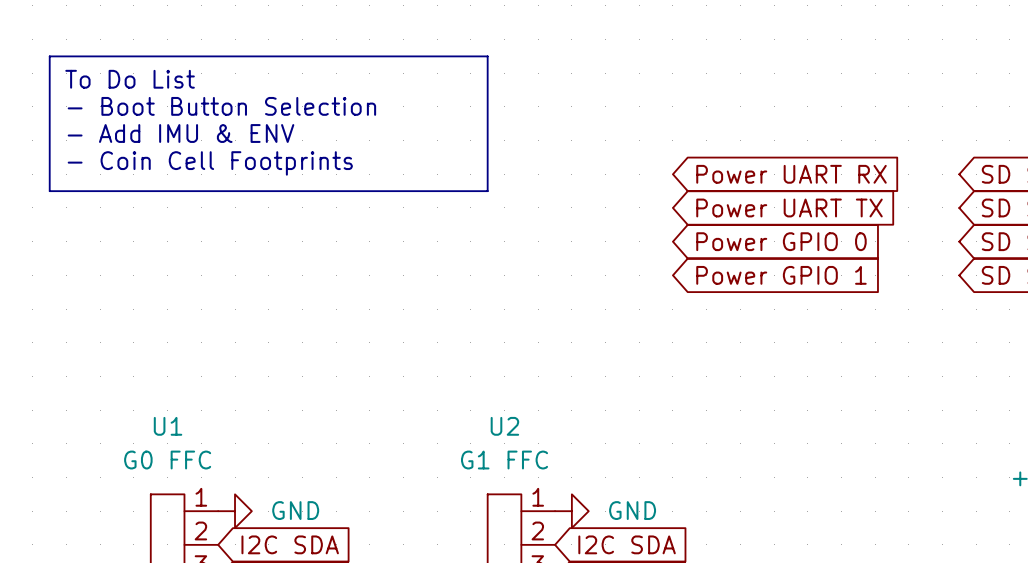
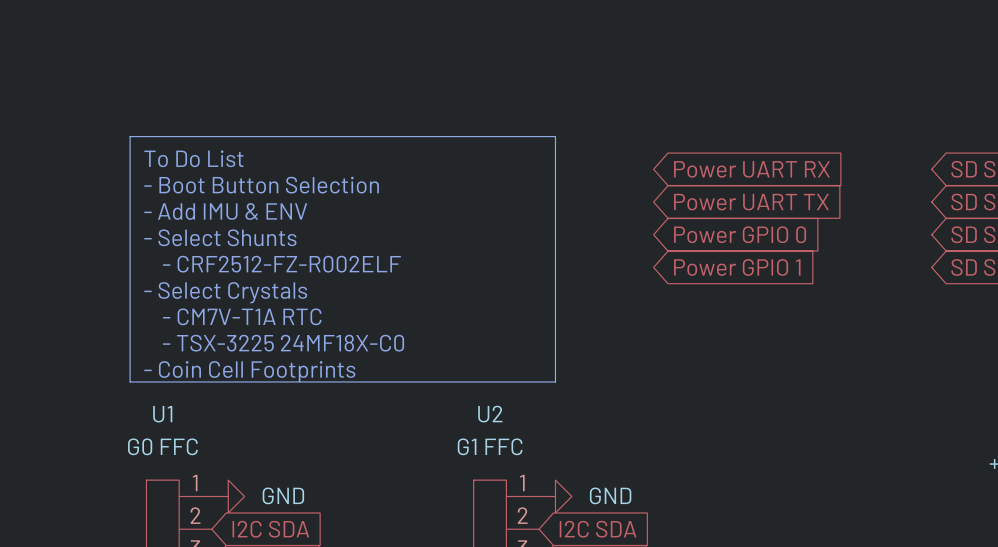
line: (49, 56) (487, 56) (487, 191) (49, 191) (49, 56) -> none
text position: To Do List (130, 79) -> To Do List (193, 158)
text position: - Boot Button Selection (221, 106) -> - Boot Button Selection (261, 185)
text position: - Add IMU & ENV (181, 133) -> - Add IMU & ENV (225, 211)
line: none -> (130, 136) (555, 136) (555, 381) (130, 381) (130, 136)
text position: - Coin Cell Footprints (210, 163) -> - Coin Cell Footprints (249, 371)
text: none -> - Select Shunts (220, 237)
text: none -> - CRF2512-FZ-R002ELF (281, 264)
text: none -> - Select Crystals (225, 292)
text: none -> - CM7V-T1A RTC (242, 316)
text: none -> - TSX-3225 24MF18X-C0 (283, 343)

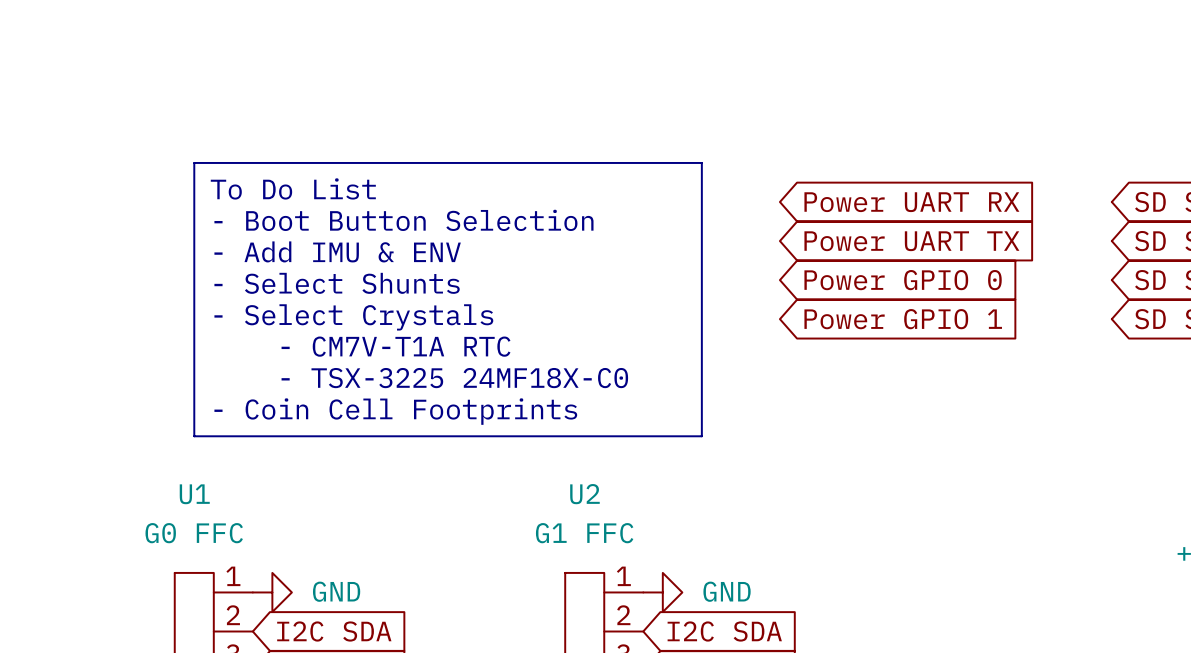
line: (162, 136) (130, 136) (130, 381) (555, 381) (555, 136) -> (194, 162) (194, 436) (701, 436) (701, 162) (662, 162)
text position: To Do List (193, 158) -> To Do List (293, 188)
text position: - Boot Button Selection (261, 185) -> - Boot Button Selection (403, 220)
text position: - Add IMU & ENV (225, 211) -> - Add IMU & ENV (337, 251)
text position: - Select Shunts (220, 237) -> - Select Shunts (337, 283)
text: - CRF2512-FZ-R002ELF (281, 264) -> none
text position: - Select Crystals (225, 292) -> - Select Crystals (353, 317)
text position: - CM7V-T1A RTC (242, 316) -> - CM7V-T1A RTC (396, 346)
text position: - TSX-3225 24MF18X-C0 (283, 343) -> - TSX-3225 24MF18X-C0 (454, 378)
text position: - Coin Cell Footprints (249, 371) -> - Coin Cell Footprints (395, 411)

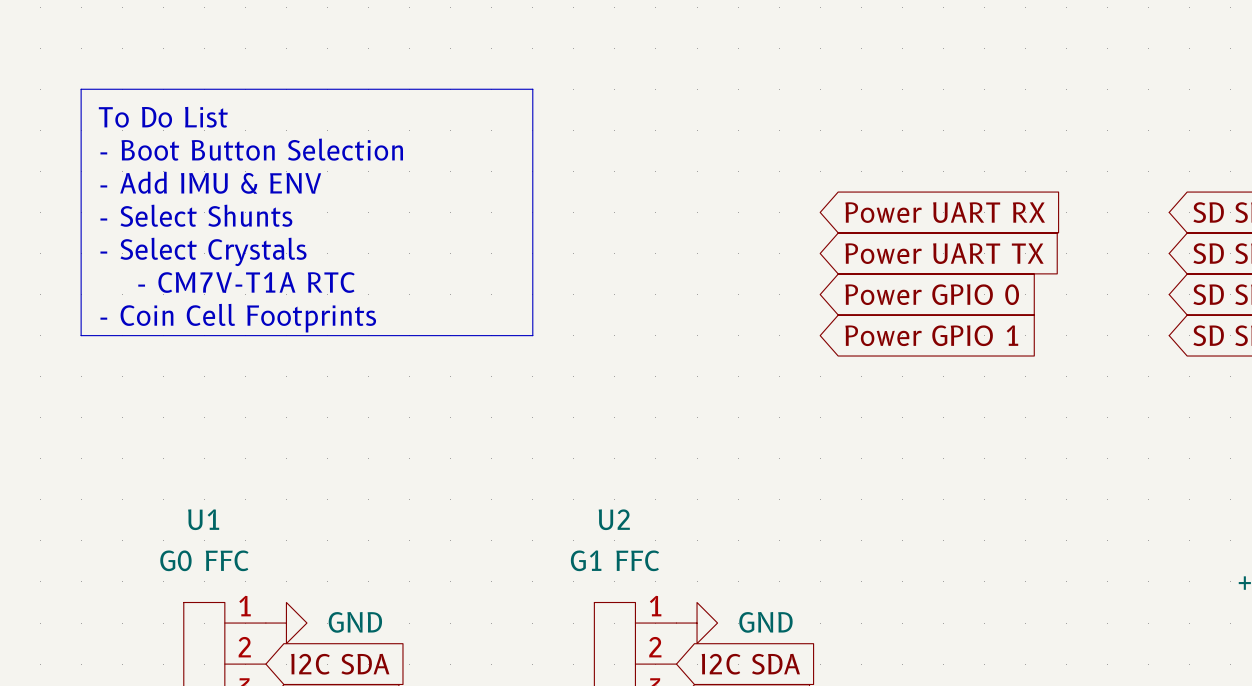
line: none -> (81, 89) (532, 89) (532, 335) (81, 335) (81, 89)
line: (194, 162) (701, 162) (701, 436) (194, 436) (194, 162) -> none
text position: To Do List (293, 188) -> To Do List (163, 117)
text position: - Boot Button Selection (403, 220) -> - Boot Button Selection (251, 149)
text position: - Add IMU & ENV (337, 251) -> - Add IMU & ENV (210, 182)
text position: - Select Shunts (337, 283) -> - Select Shunts (196, 215)
text position: - Select Crystals (353, 317) -> - Select Crystals (203, 251)
text position: - CM7V-T1A RTC (396, 346) -> - CM7V-T1A RTC (246, 282)
text: - TSX-3225 24MF18X-C0 (454, 378) -> none
text position: - Coin Cell Footprints (395, 411) -> - Coin Cell Footprints (238, 318)

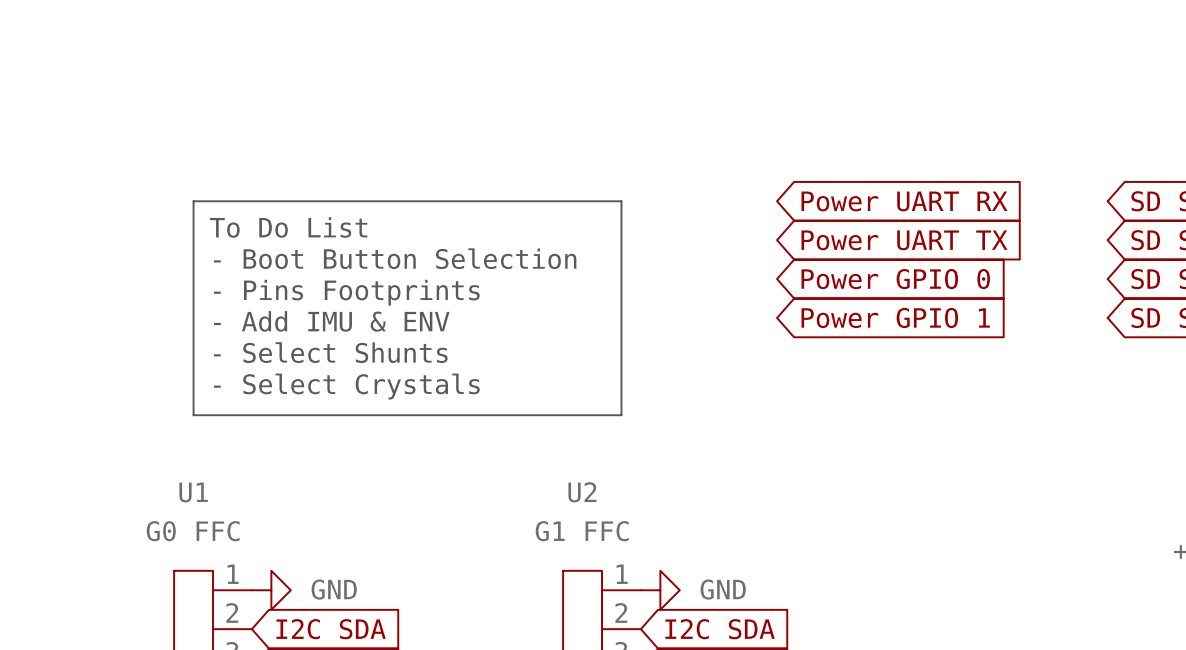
line: (81, 89) (532, 89) (532, 335) (81, 335) (81, 89) -> none
text position: To Do List (163, 117) -> To Do List (288, 227)
text position: - Boot Button Selection (251, 149) -> - Boot Button Selection (395, 258)
text position: - Add IMU & ENV (210, 182) -> - Add IMU & ENV (331, 321)
line: none -> (193, 201) (621, 201) (621, 415) (193, 415) (193, 201)
text position: - Select Shunts (196, 215) -> - Select Shunts (330, 352)
text position: - Select Crystals (203, 251) -> - Select Crystals (346, 386)
text: - CM7V-T1A RTC (246, 282) -> none
text: - Coin Cell Footprints (238, 318) -> - Pins Footprints (346, 292)

